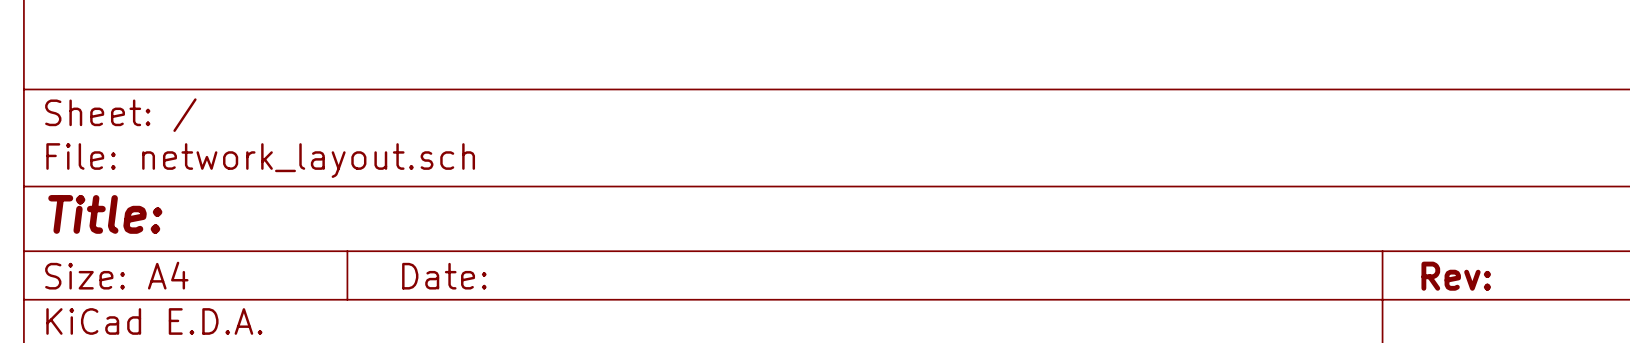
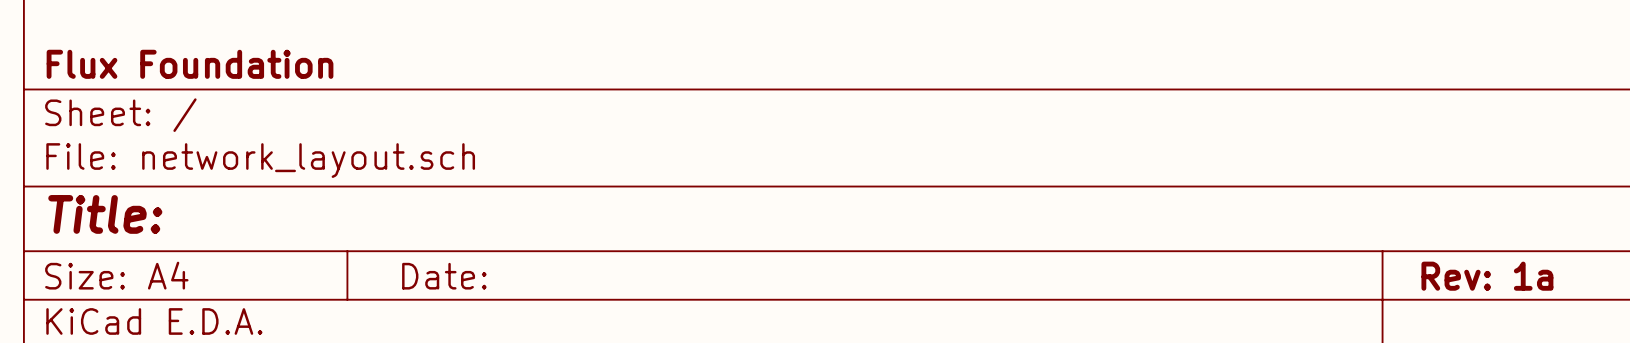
title block: none -> Flux Foundation (190, 64)
title block: Rev: (1456, 276) -> Rev: 1a (1487, 276)

